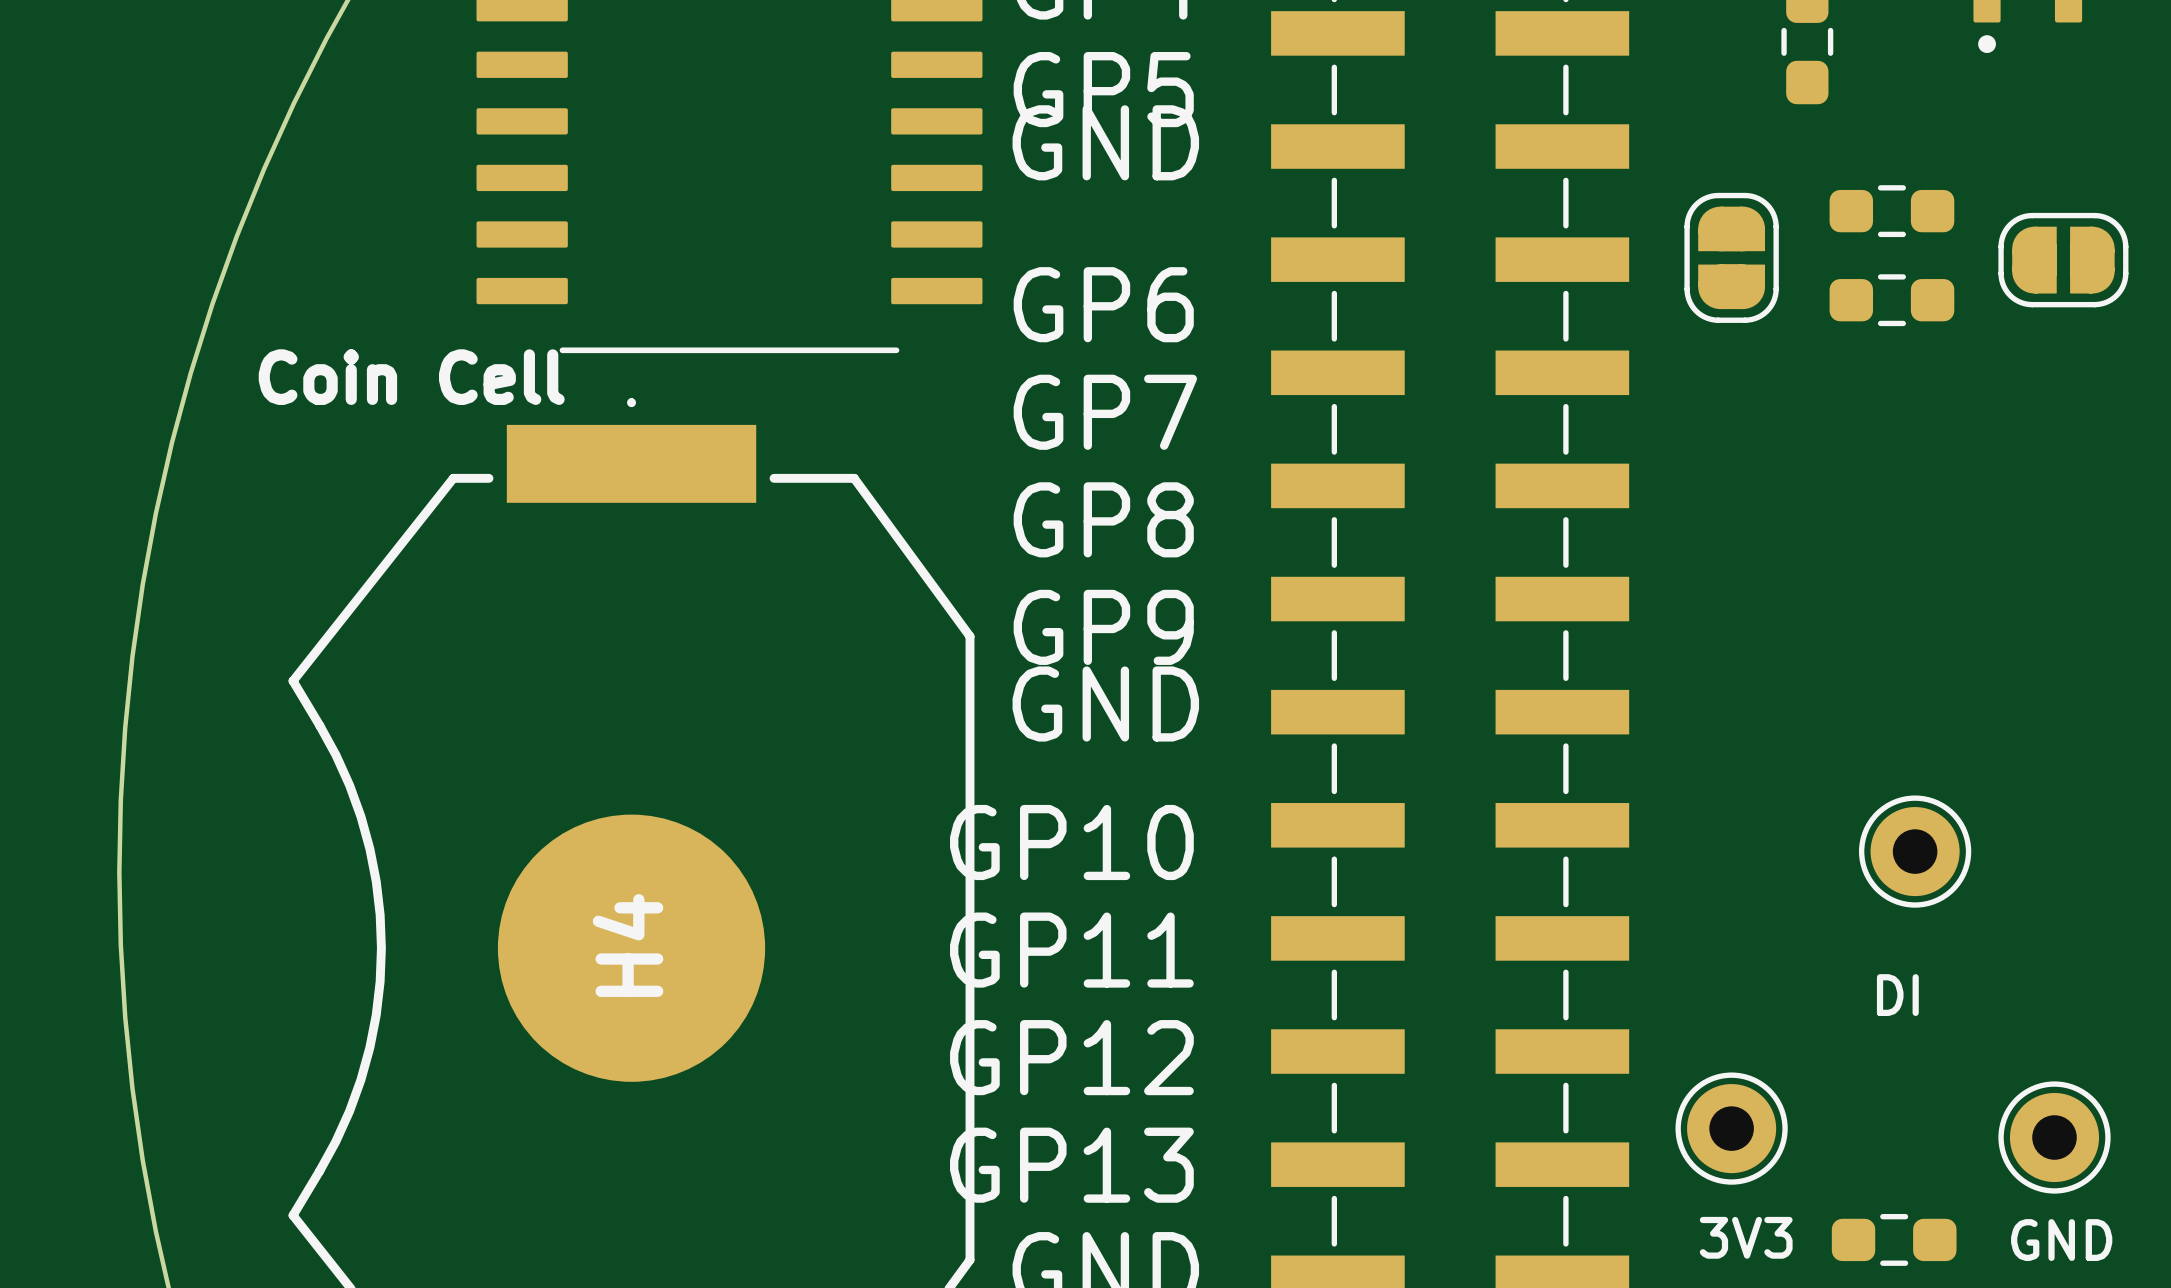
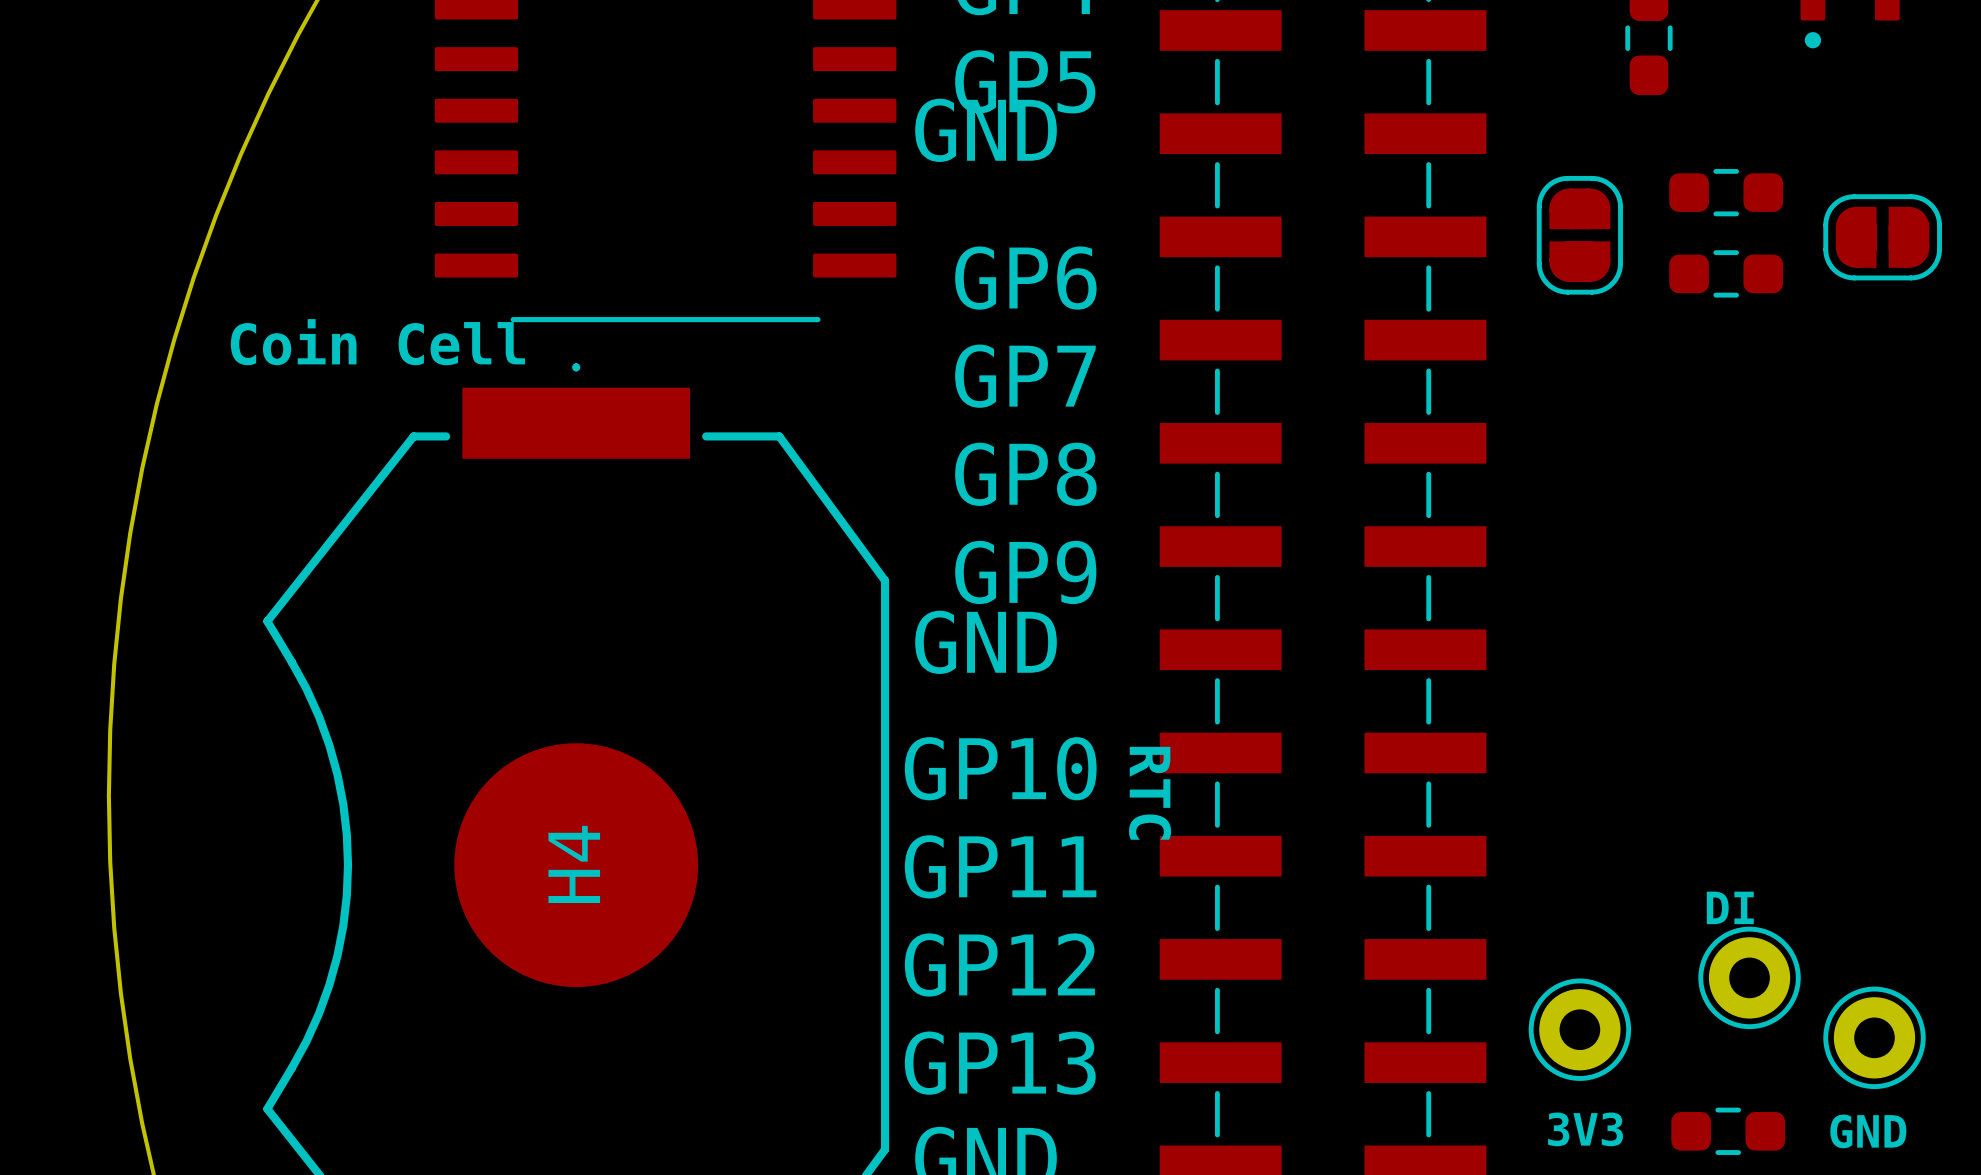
part position: (1915, 851) -> (1749, 977)
text: none -> RTC (1150, 793)

